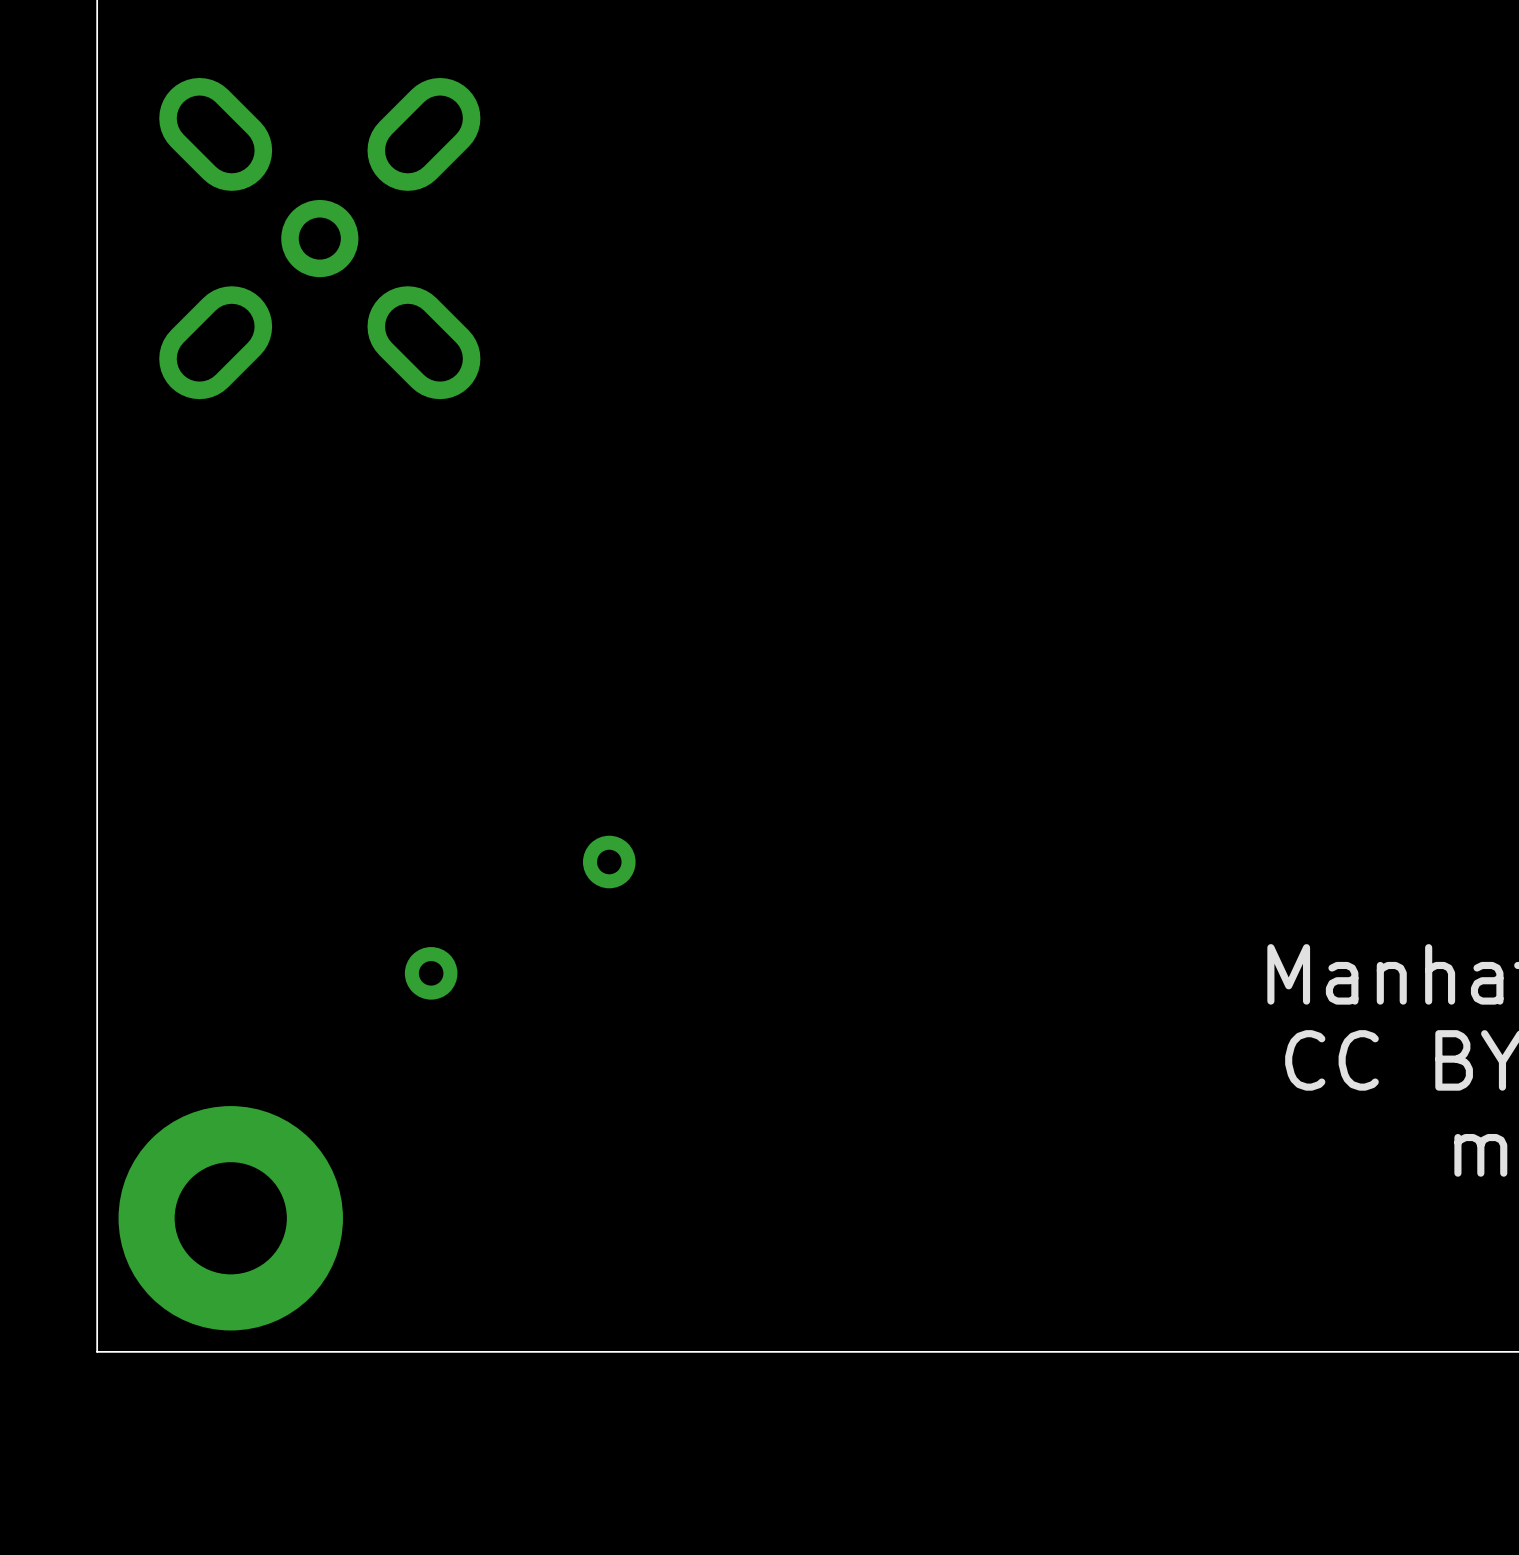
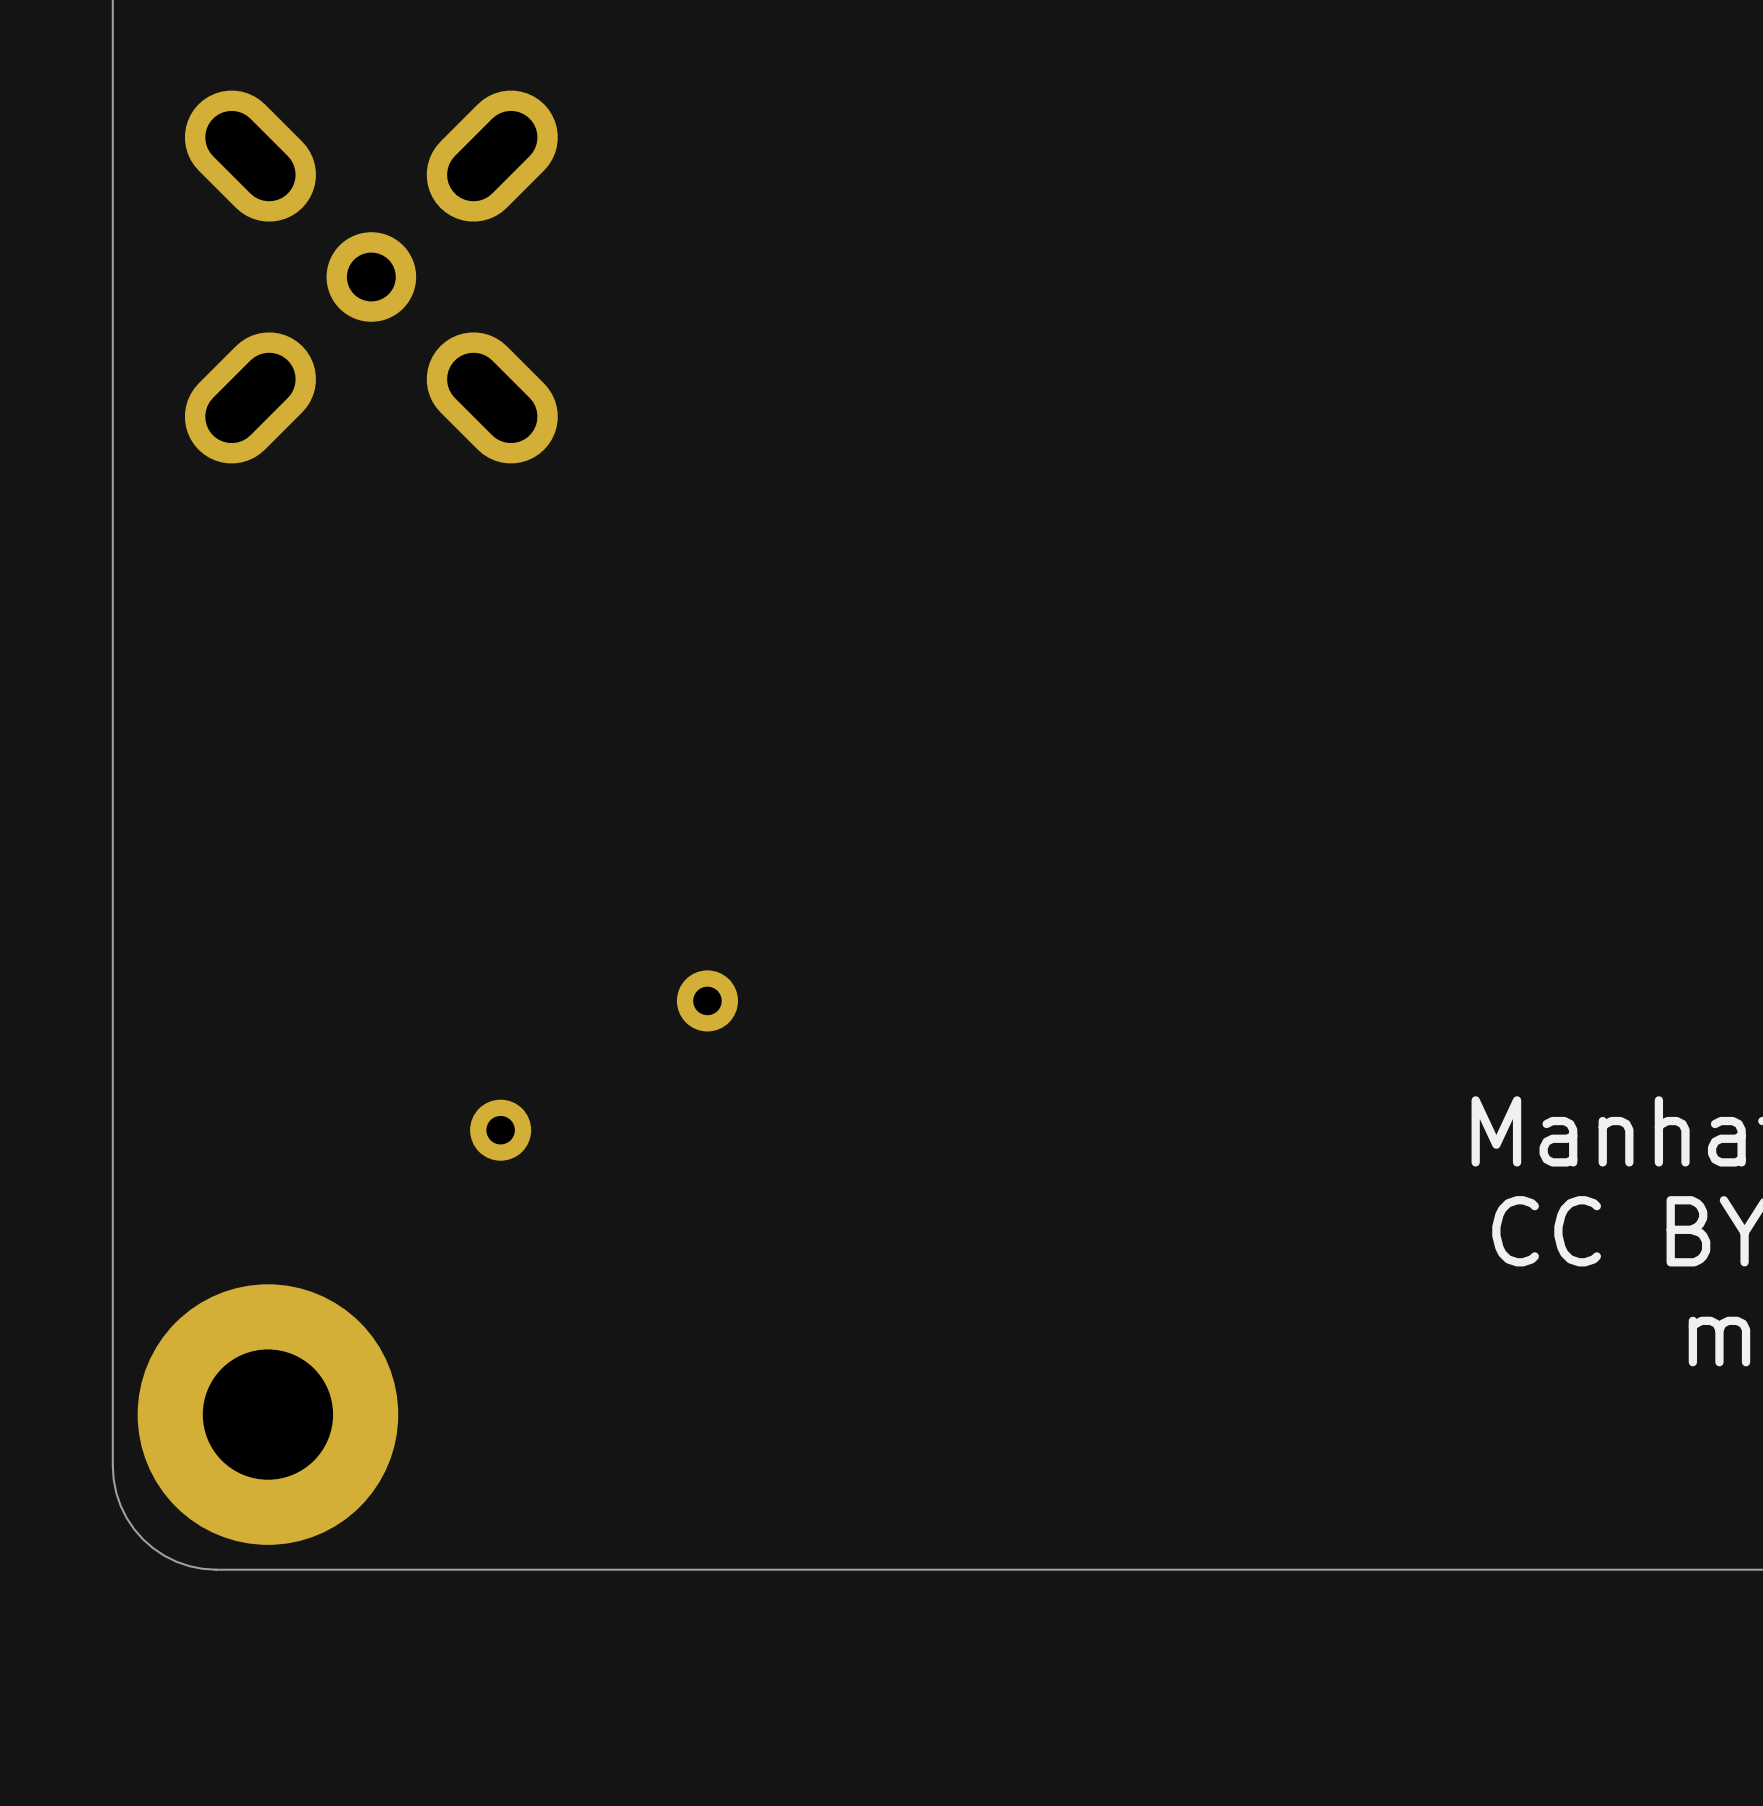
board edge: (97, 1262) (97, 1351) (186, 1351) -> (112, 1466) (113, 1479) (120, 1505) (126, 1518) (143, 1539) (164, 1555) (176, 1561) (202, 1568) (216, 1569)

